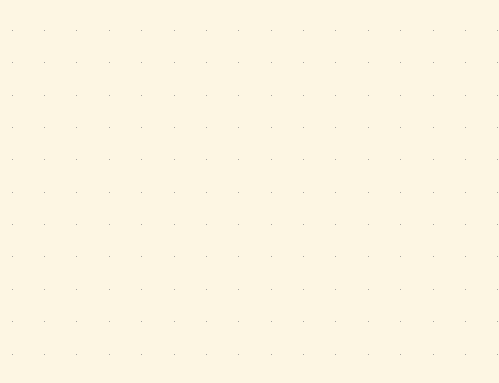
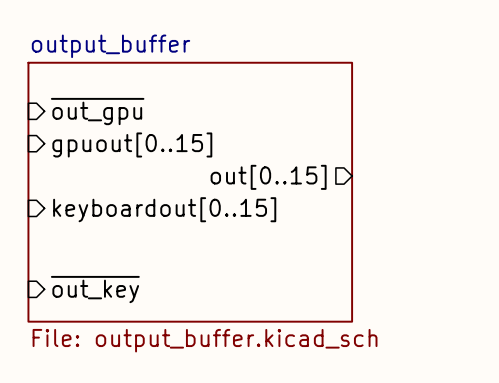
sheet pin: none -> ~{out_gpu} (97, 111)
sheet pin: none -> gpuout[0..15] (132, 144)
sheet pin: none -> out[0..15] (268, 177)
sheet output_buffer: none -> File: output_buffer.kicad_sch (190, 192)
sheet pin: none -> keyboardout[0..15] (164, 209)
sheet pin: none -> ~{out_key} (95, 289)

